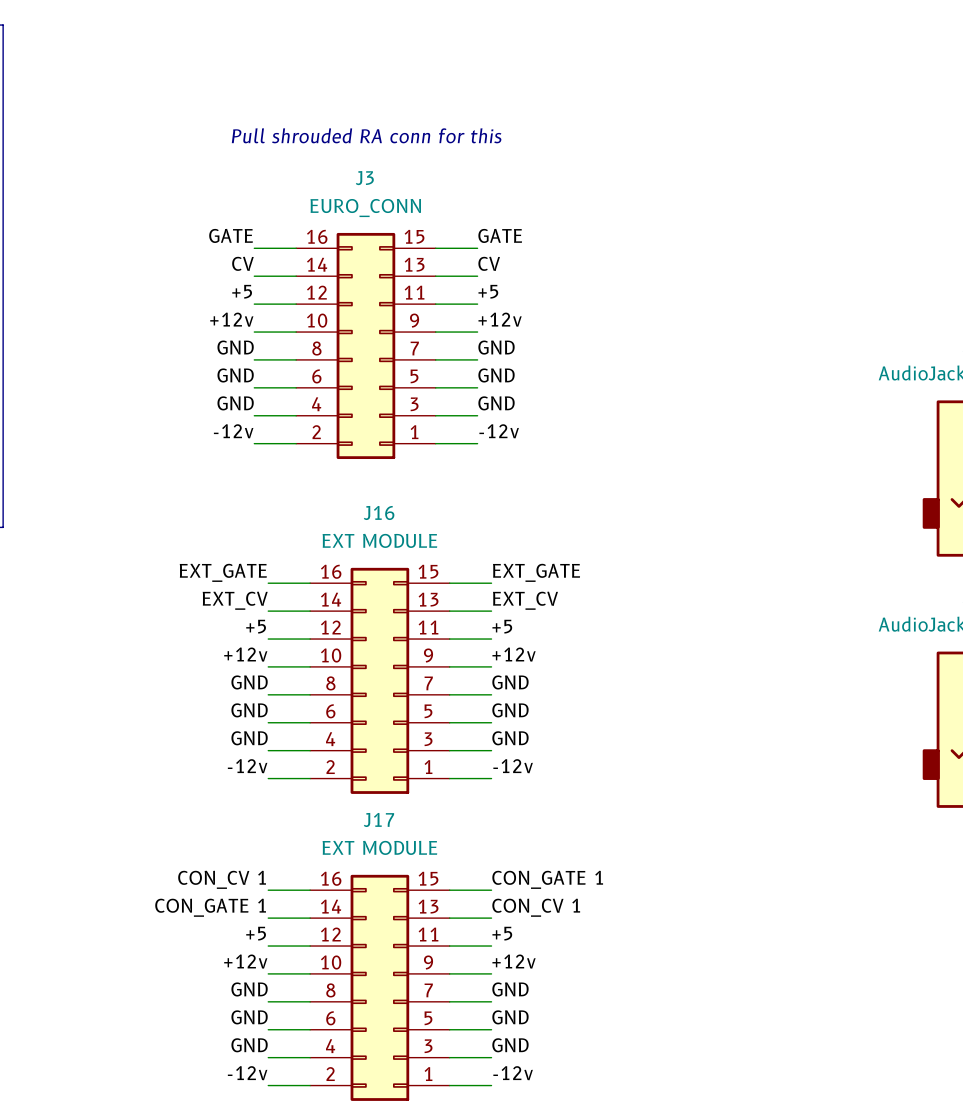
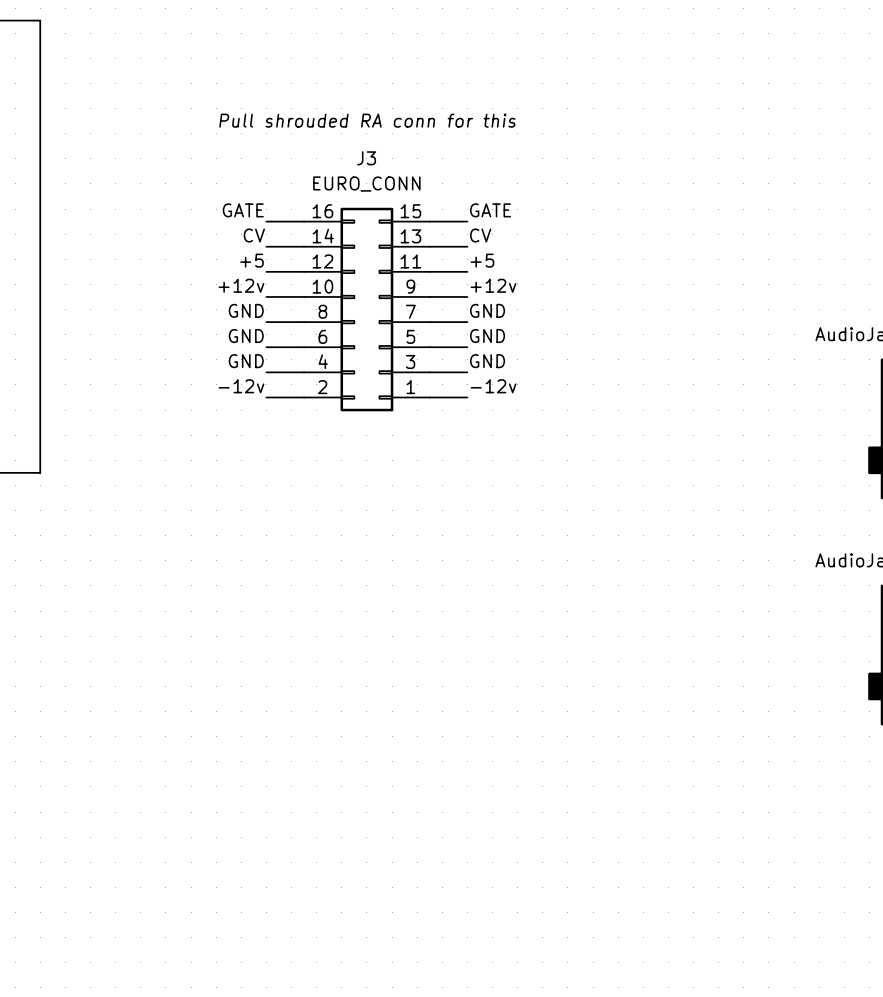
label: EXT_GATE (223, 572) -> none
label: EXT_GATE (536, 572) -> none
wire: (268, 583) (310, 583) -> none
wire: (449, 583) (491, 583) -> none
label: EXT_CV (235, 600) -> none
label: EXT_CV (525, 600) -> none
wire: (268, 611) (310, 611) -> none
wire: (449, 611) (491, 611) -> none
label: +5 (256, 626) -> none
label: +5 (502, 626) -> none
wire: (268, 639) (310, 639) -> none
wire: (449, 639) (491, 639) -> none
label: +12v (245, 654) -> none
label: +12v (514, 654) -> none
wire: (268, 666) (310, 666) -> none
wire: (449, 666) (491, 666) -> none
J16: EXT MODULE (379, 680) -> none
label: GND (249, 682) -> none
label: GND (510, 682) -> none
wire: (268, 694) (310, 694) -> none
wire: (449, 694) (491, 694) -> none
label: GND (249, 710) -> none
label: GND (510, 710) -> none
wire: (268, 722) (310, 722) -> none
wire: (449, 722) (491, 722) -> none
label: GND (249, 738) -> none
label: GND (510, 738) -> none
wire: (268, 750) (310, 750) -> none
wire: (449, 750) (491, 750) -> none
label: -12v (247, 766) -> none
label: -12v (513, 766) -> none
wire: (268, 778) (310, 778) -> none
wire: (449, 778) (491, 778) -> none
label: CON_CV 1 (222, 879) -> none
label: CON_GATE 1 (547, 879) -> none
wire: (268, 890) (310, 890) -> none
wire: (449, 890) (491, 890) -> none
label: CON_GATE 1 (210, 907) -> none
label: CON_CV 1 (536, 907) -> none
wire: (268, 918) (310, 918) -> none
wire: (449, 918) (491, 918) -> none
label: +5 (256, 933) -> none
label: +5 (502, 933) -> none
wire: (268, 946) (310, 946) -> none
wire: (449, 946) (491, 946) -> none
label: +12v (245, 961) -> none
label: +12v (514, 961) -> none
wire: (268, 973) (310, 973) -> none
wire: (449, 973) (491, 973) -> none
J17: EXT MODULE (379, 987) -> none
label: GND (249, 989) -> none
label: GND (510, 989) -> none
wire: (268, 1001) (310, 1001) -> none
wire: (449, 1001) (491, 1001) -> none
label: GND (249, 1017) -> none
label: GND (510, 1017) -> none
wire: (268, 1029) (310, 1029) -> none
wire: (449, 1029) (491, 1029) -> none
label: GND (249, 1045) -> none
label: GND (510, 1045) -> none
wire: (268, 1057) (310, 1057) -> none
wire: (449, 1057) (491, 1057) -> none
label: -12v (247, 1073) -> none
label: -12v (513, 1073) -> none
wire: (268, 1085) (310, 1085) -> none
wire: (449, 1085) (491, 1085) -> none

